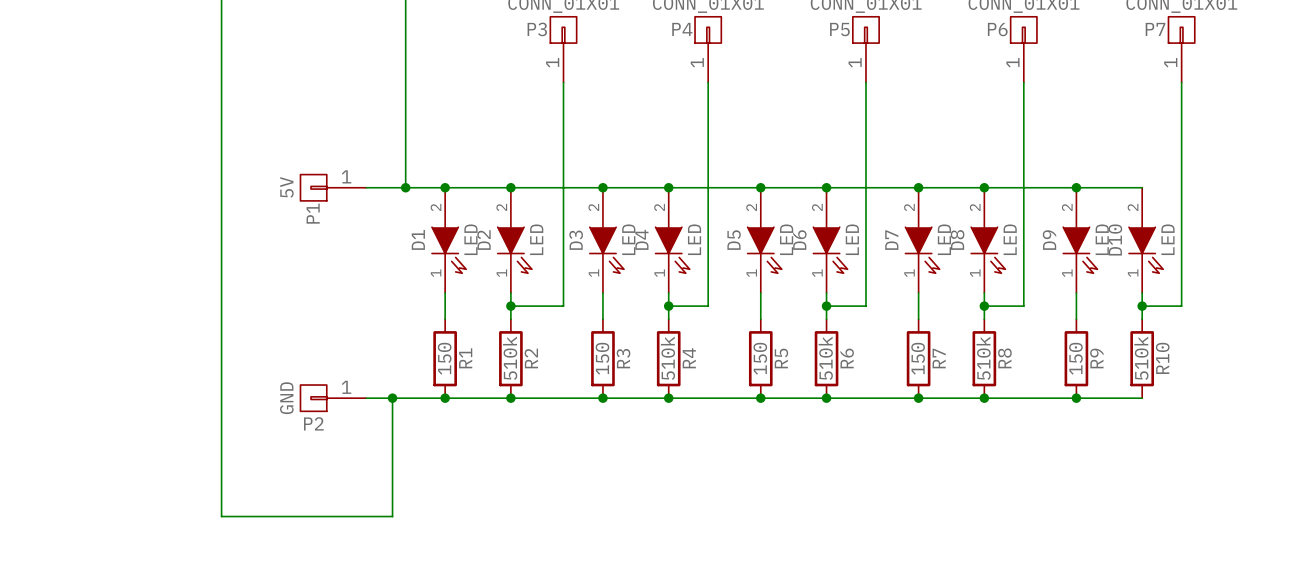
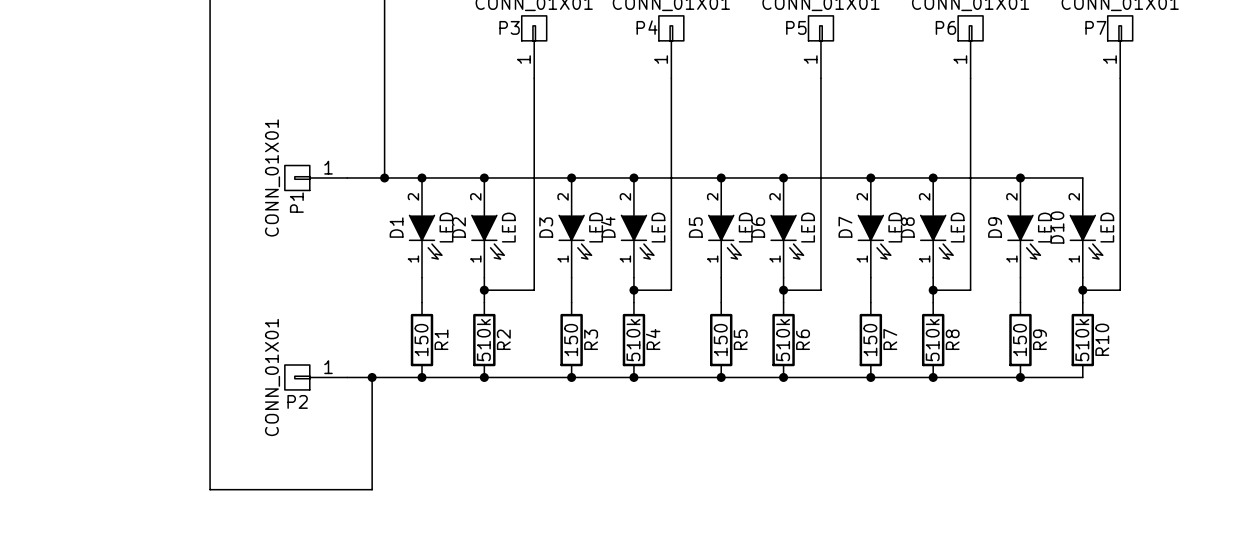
P1 value: 5V (286, 187) -> CONN_01X01 (272, 177)
P2 value: GND (286, 398) -> CONN_01X01 (272, 377)

